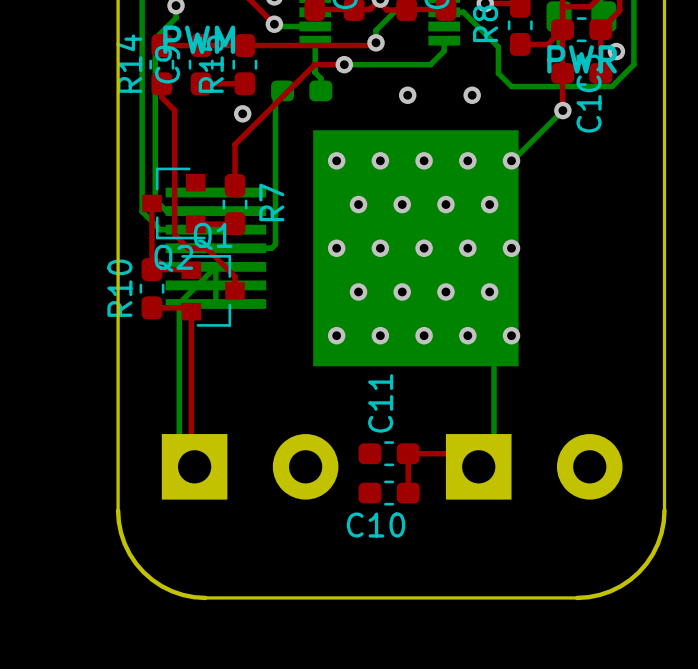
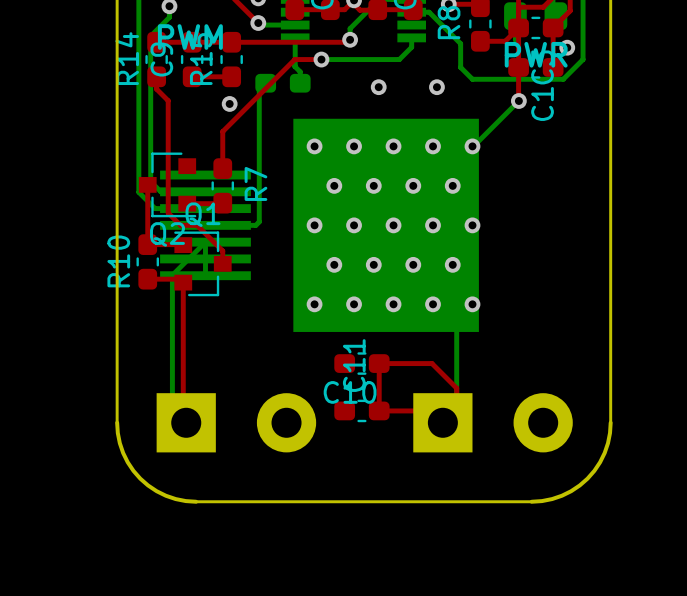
top track: (408, 453) (408, 493) -> (379, 410) (379, 363) (432, 363) (456, 388) (456, 422) (444, 410)
board edge: (118, 466) (118, 521) (129, 554) (152, 579) (182, 594) (205, 597) (577, 597) (599, 594) (620, 586) (638, 572) (652, 554) (663, 521) (664, 466) -> (117, 422) (123, 453) (140, 478) (165, 495) (185, 501) (531, 501) (561, 495) (587, 478) (604, 453) (610, 422)
C10 position: (389, 493) -> (361, 363)

